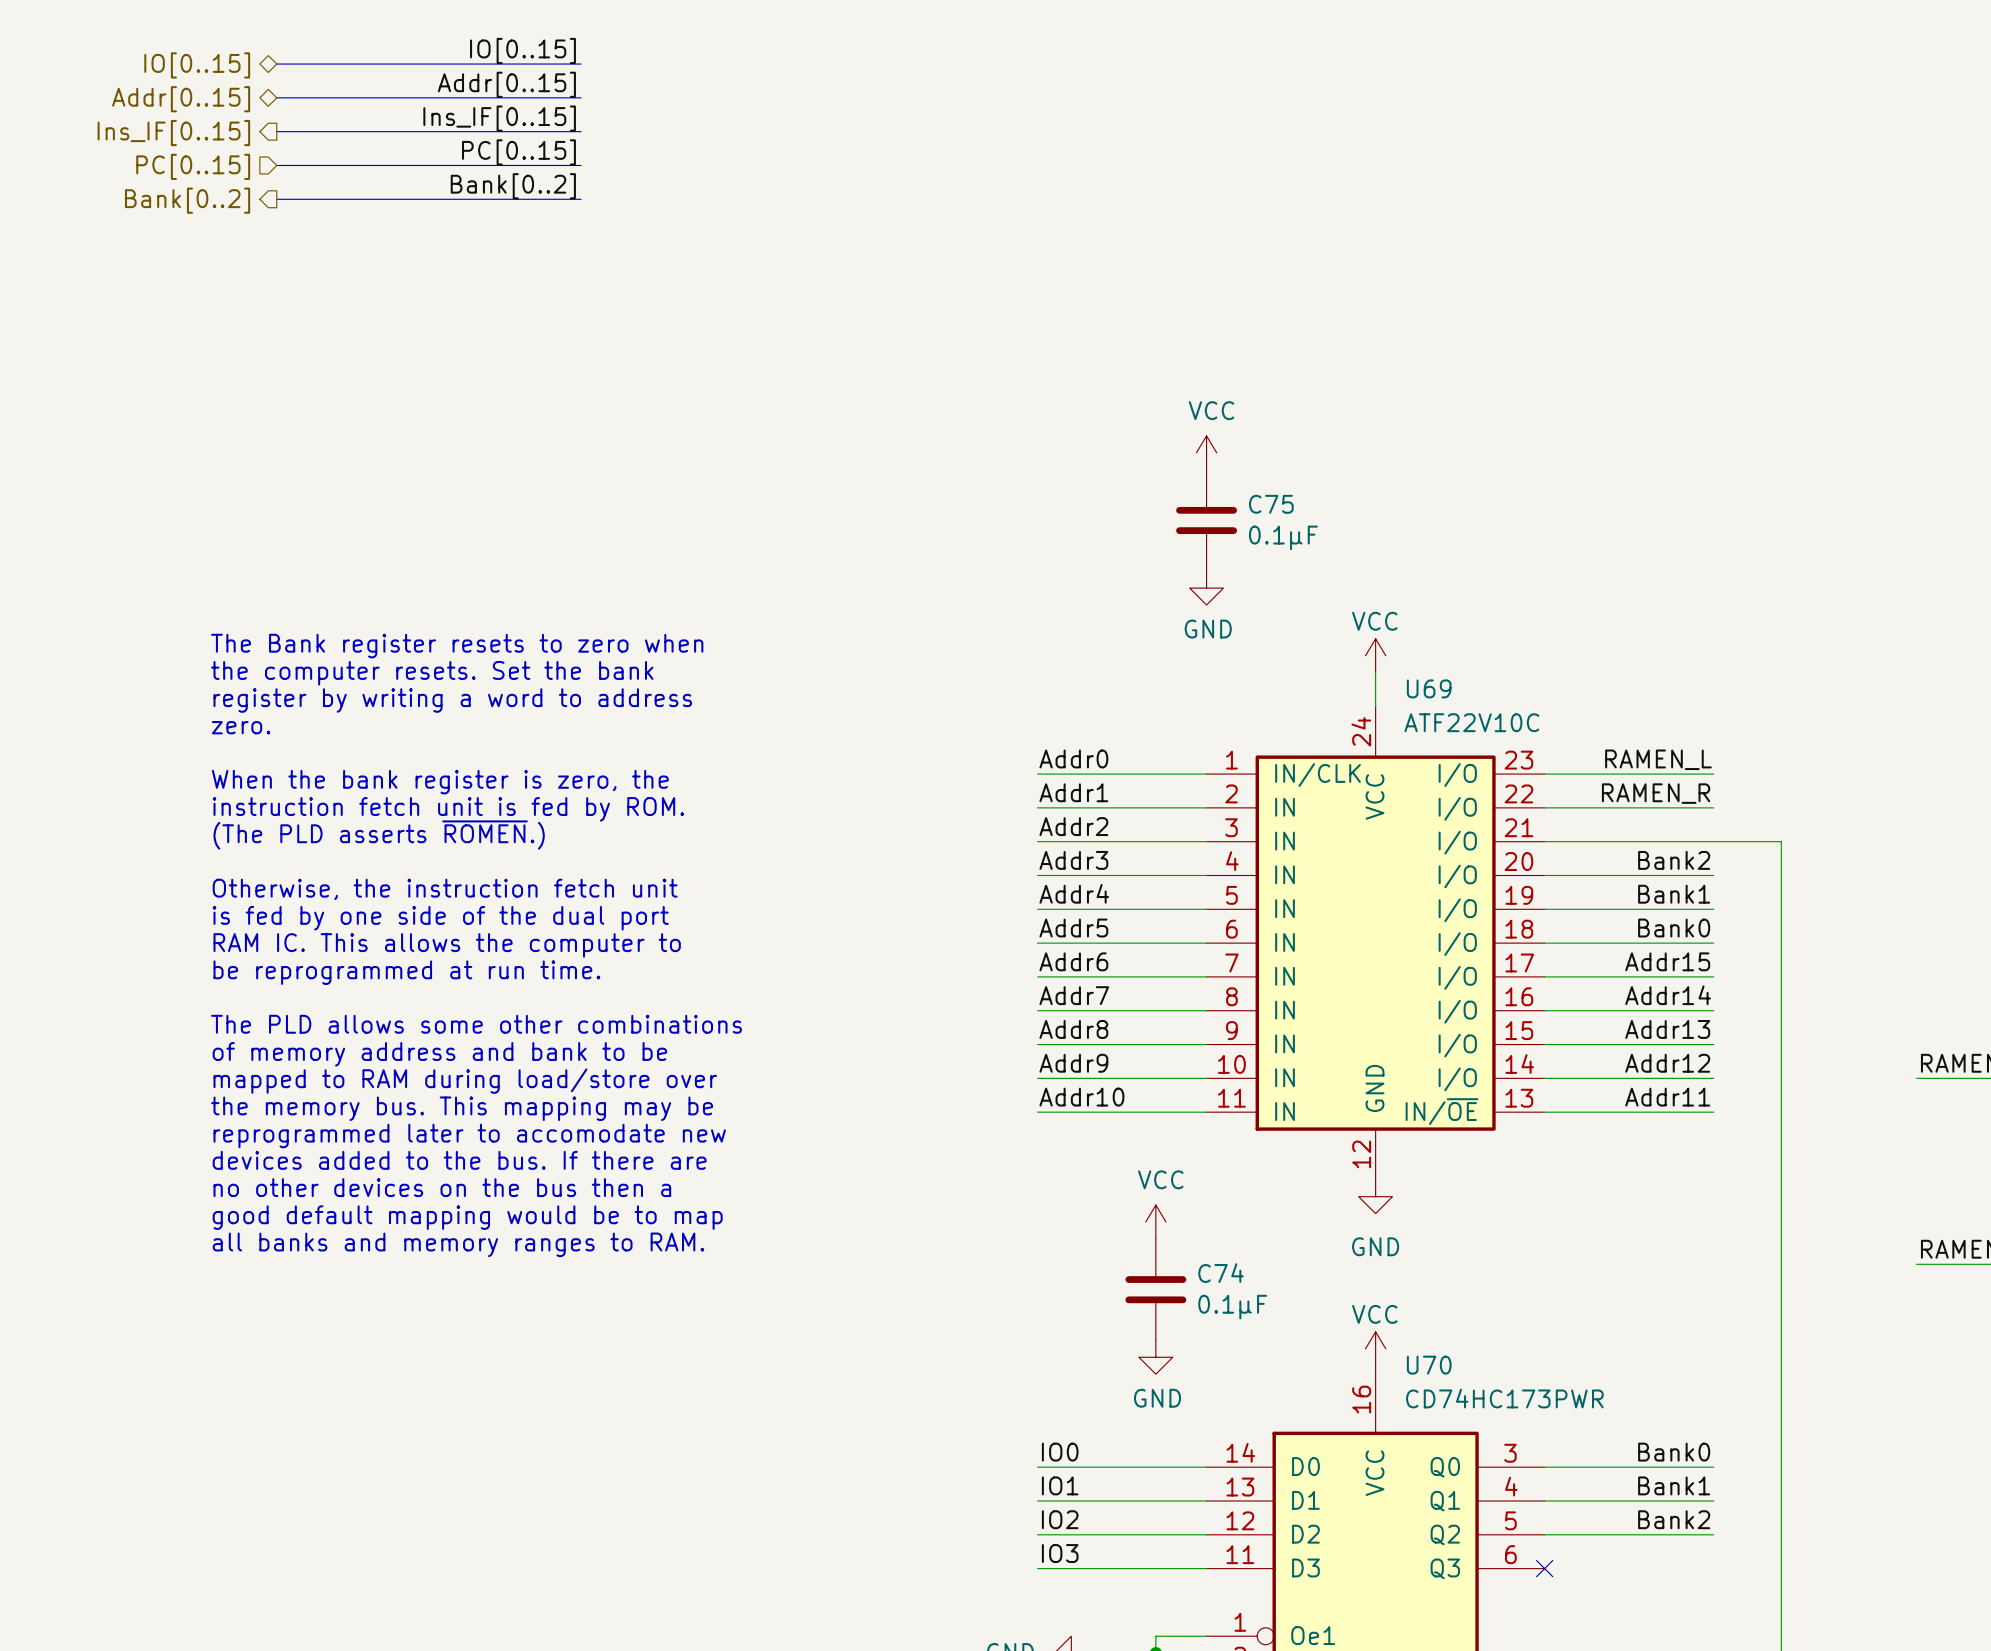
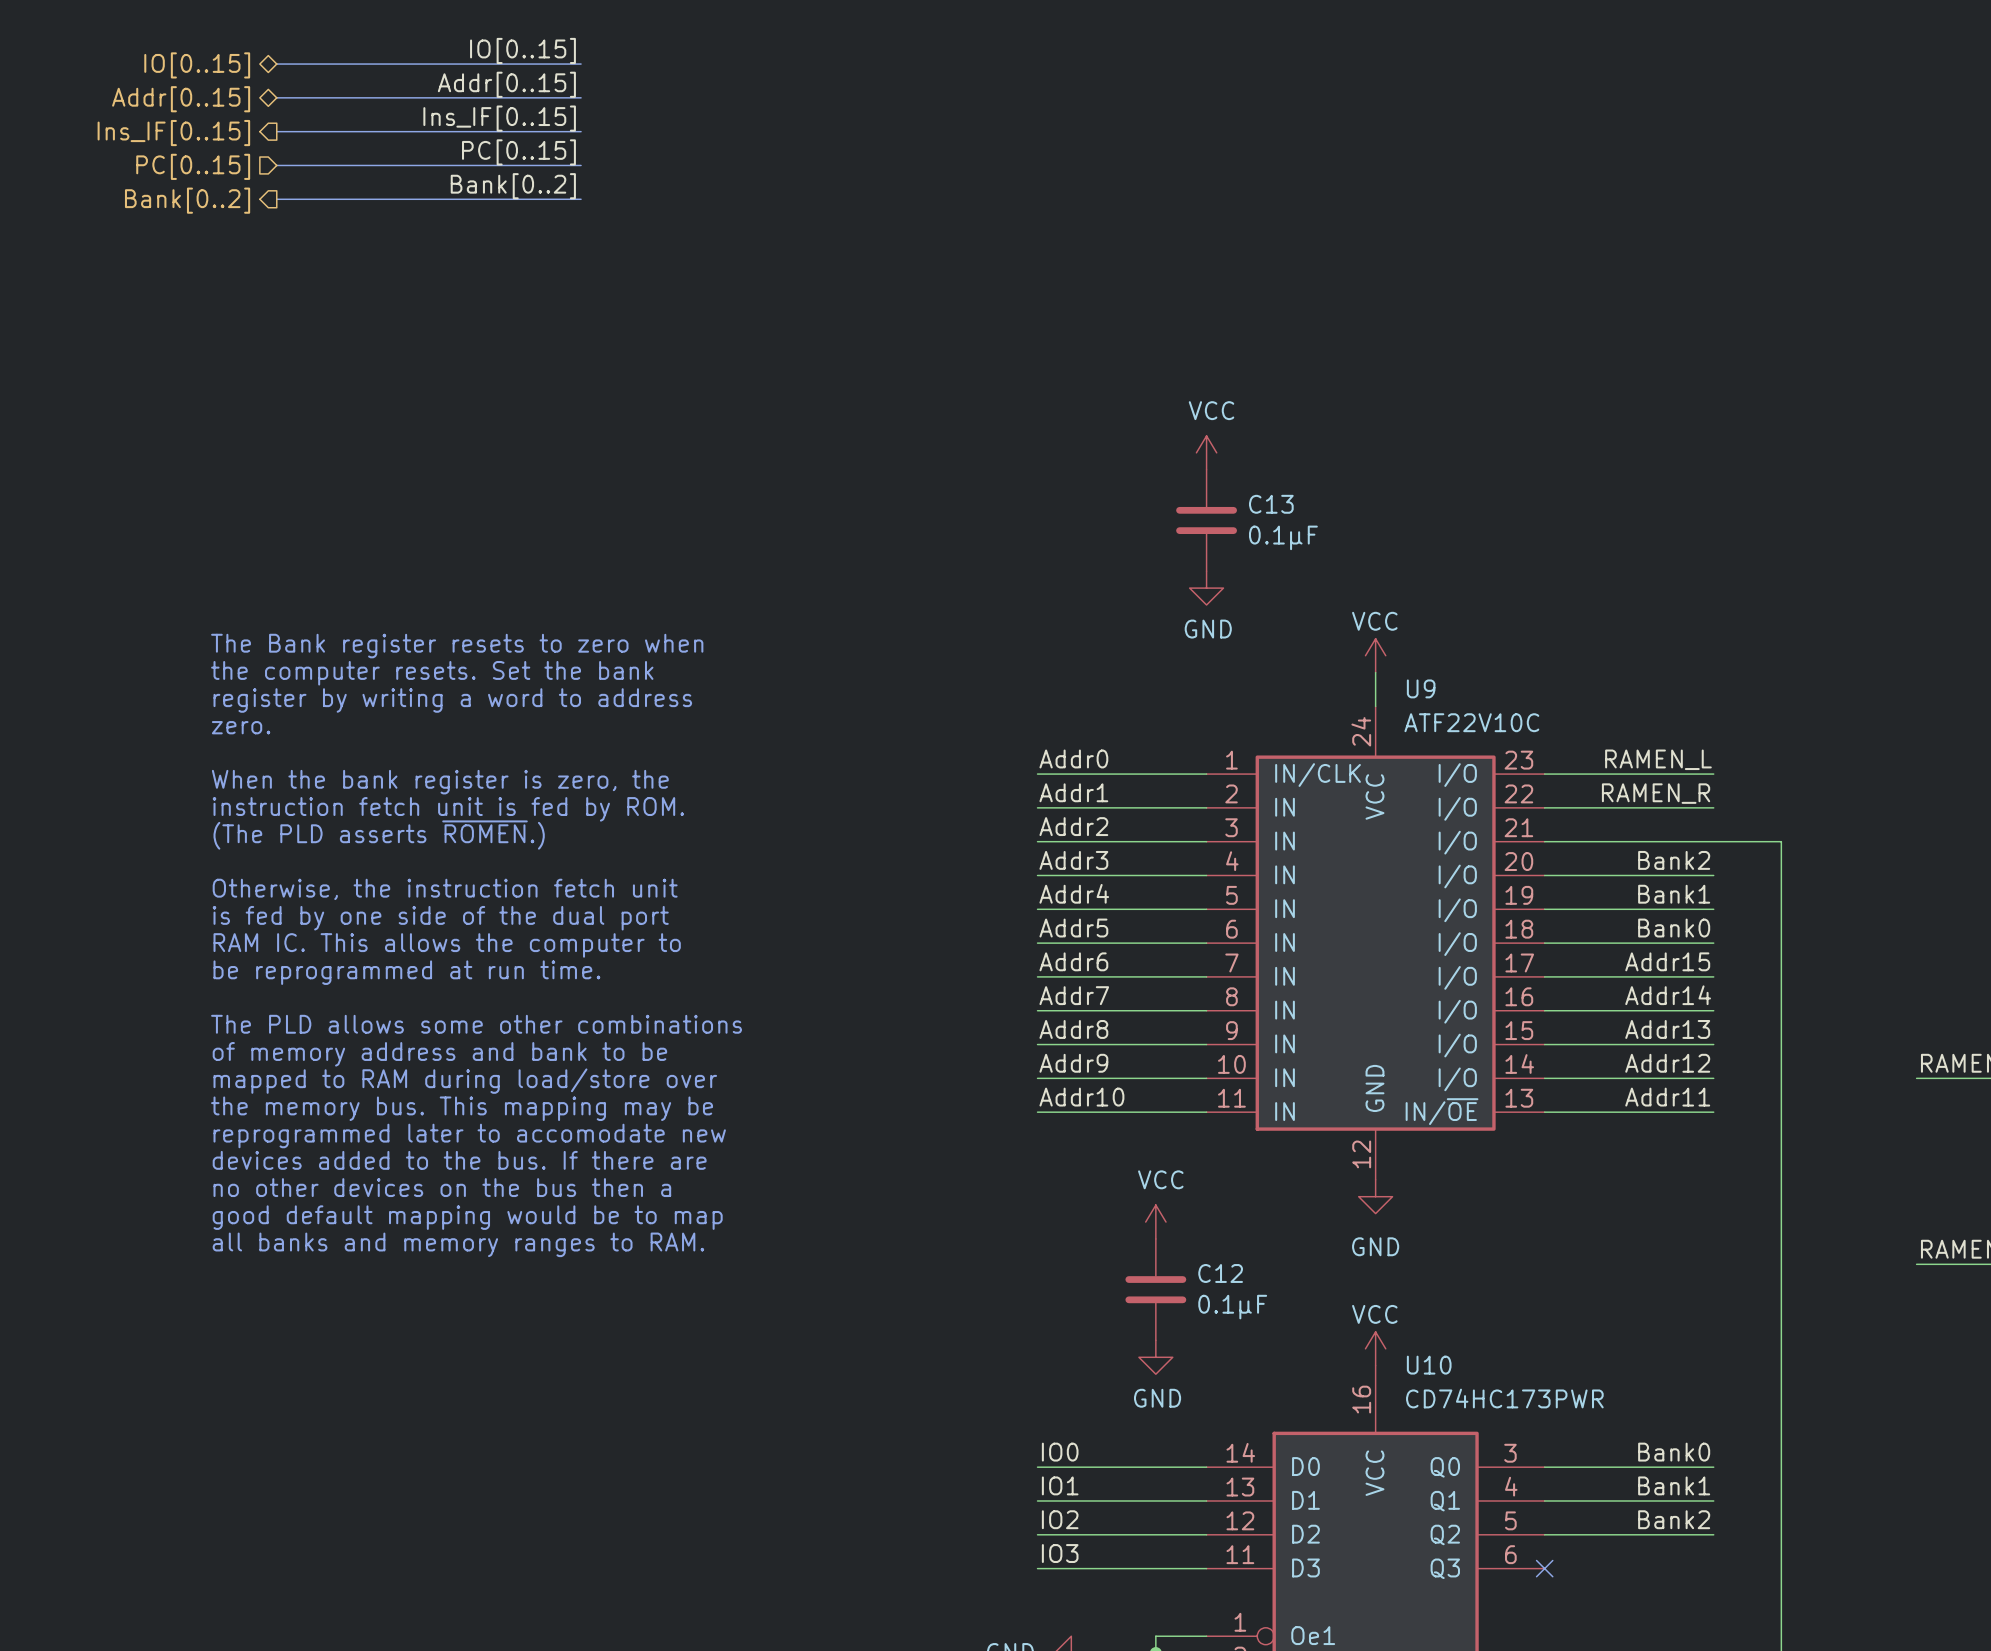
C75 name: C75 (1271, 504) -> C13 (1271, 504)
U69 name: U69 (1429, 688) -> U9 (1421, 688)
C74 name: C74 (1221, 1273) -> C12 (1220, 1273)
U70 name: U70 (1429, 1365) -> U10 (1429, 1365)

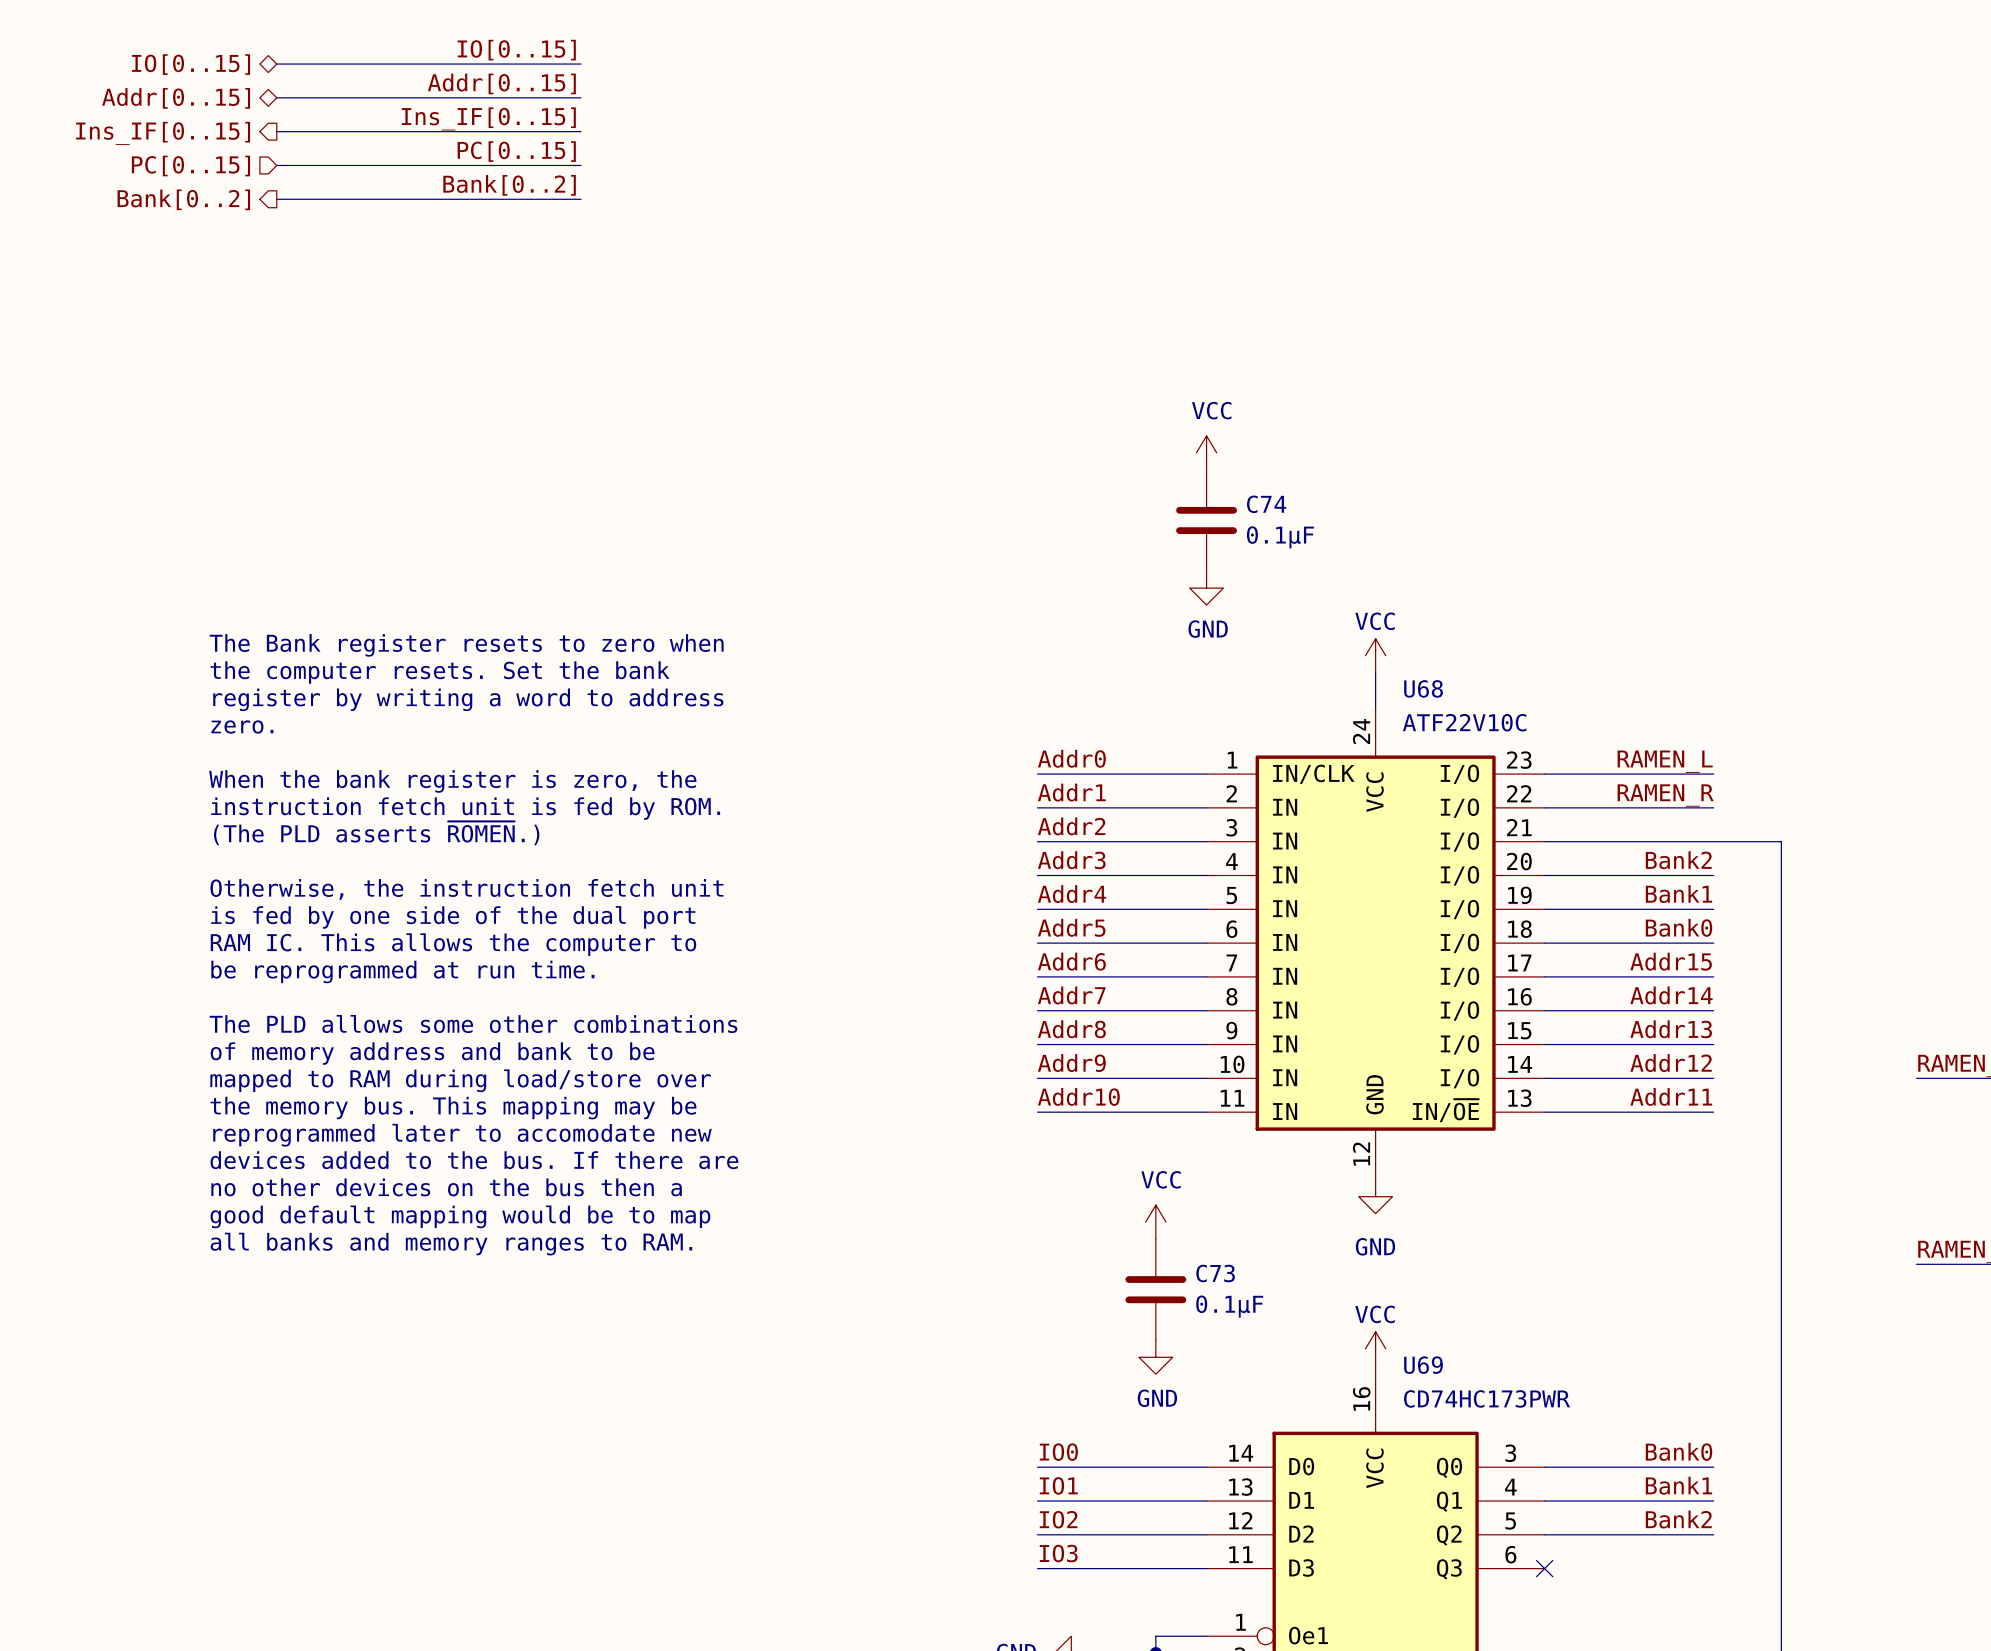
C13 name: C13 (1271, 504) -> C74 (1266, 504)
U9 name: U9 (1421, 688) -> U68 (1423, 688)
C12 name: C12 (1220, 1273) -> C73 (1215, 1273)
U10 name: U10 (1429, 1365) -> U69 (1423, 1365)

